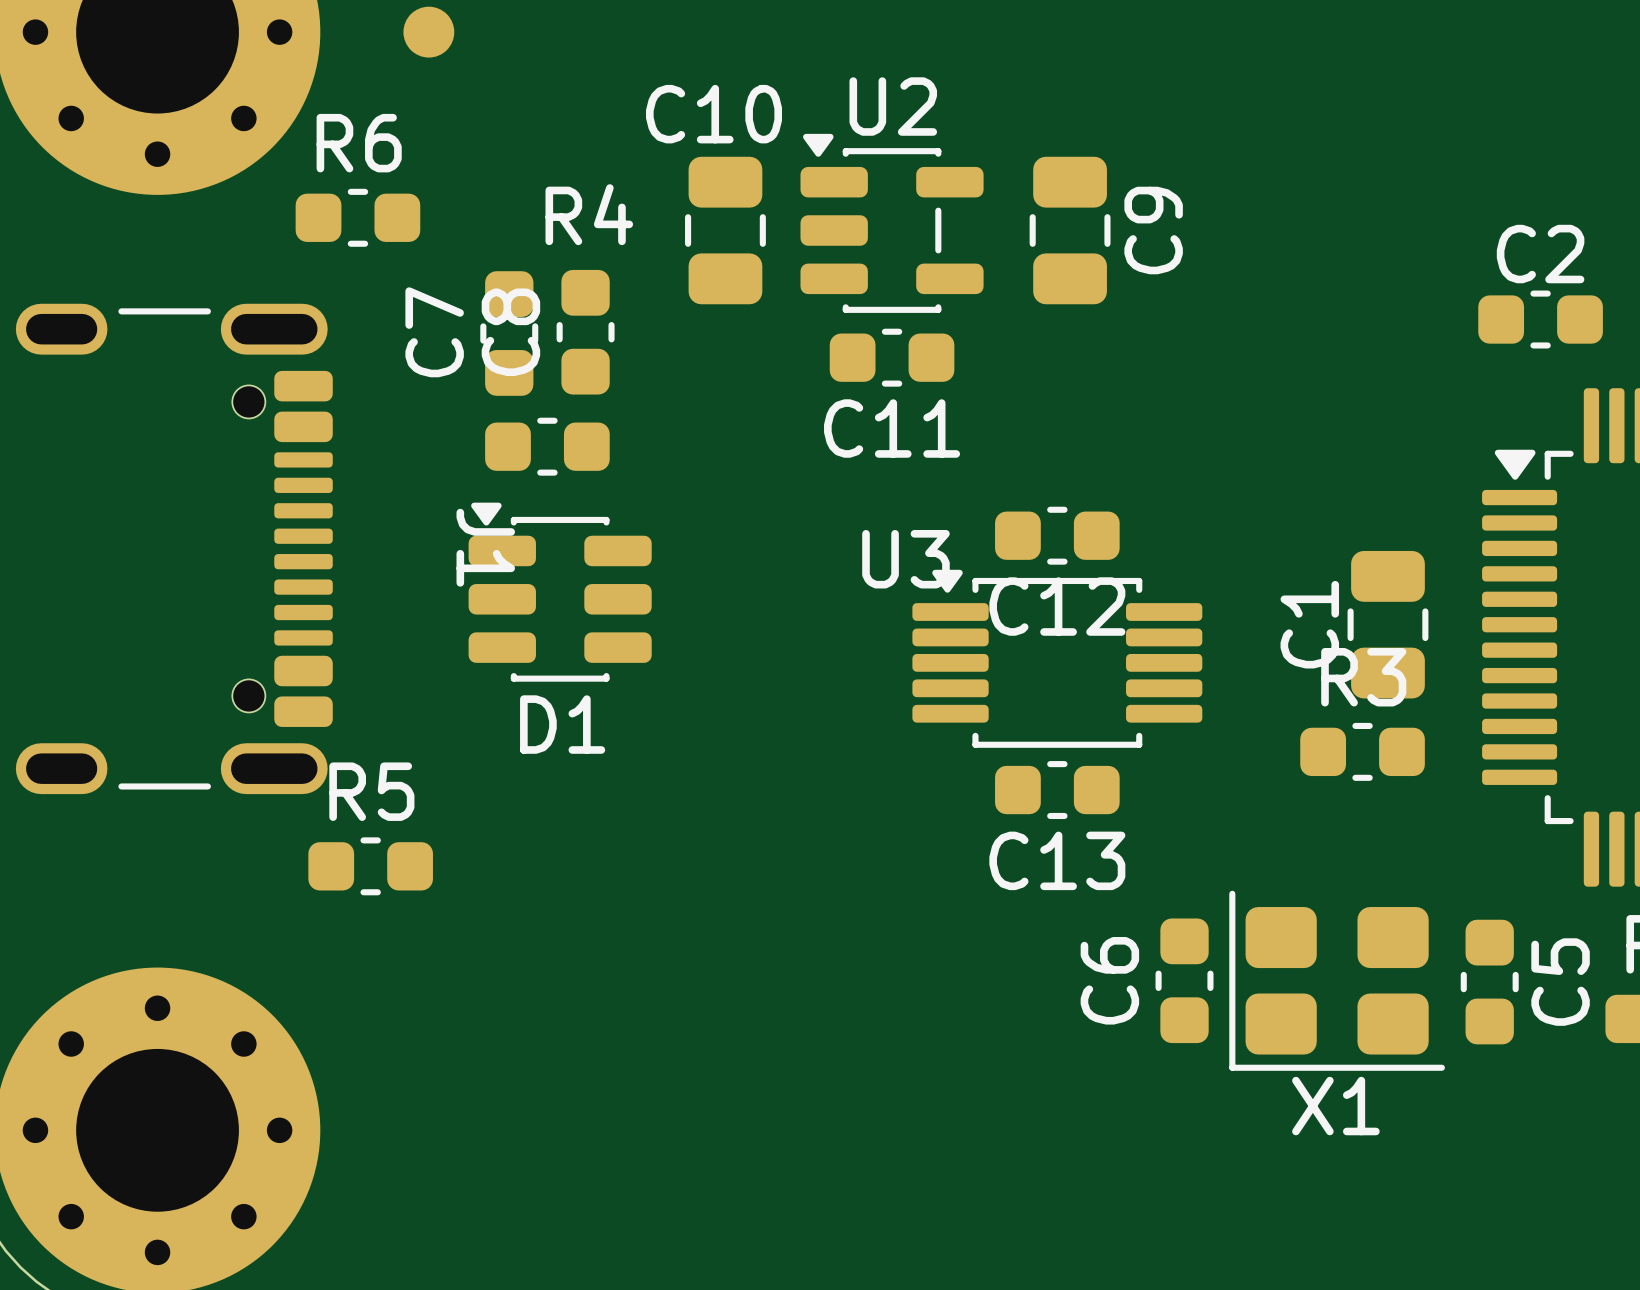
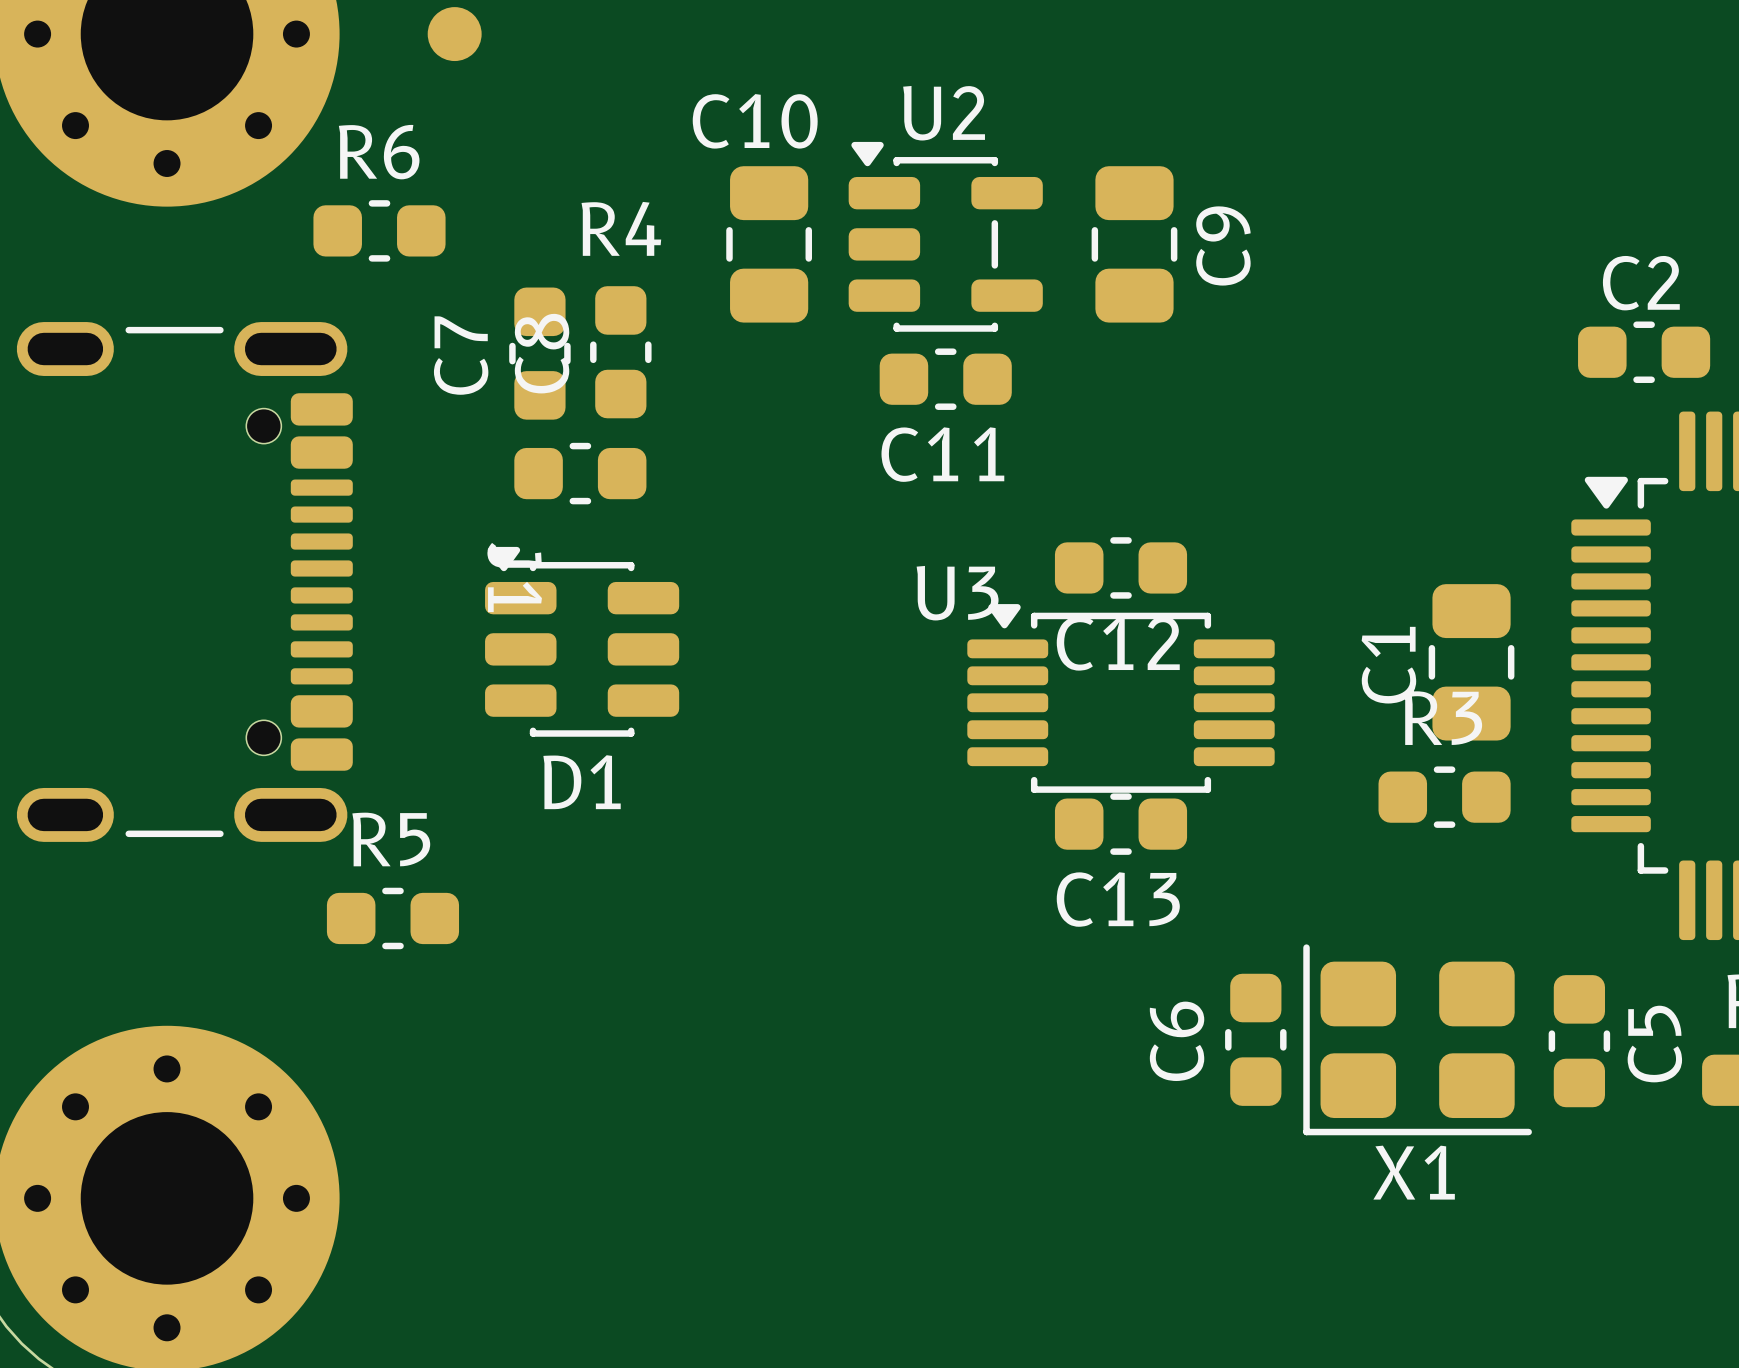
C2 position: (1540, 319) -> (1644, 352)
D1 position: (560, 592) -> (582, 641)
C13 position: (1057, 790) -> (1121, 824)

